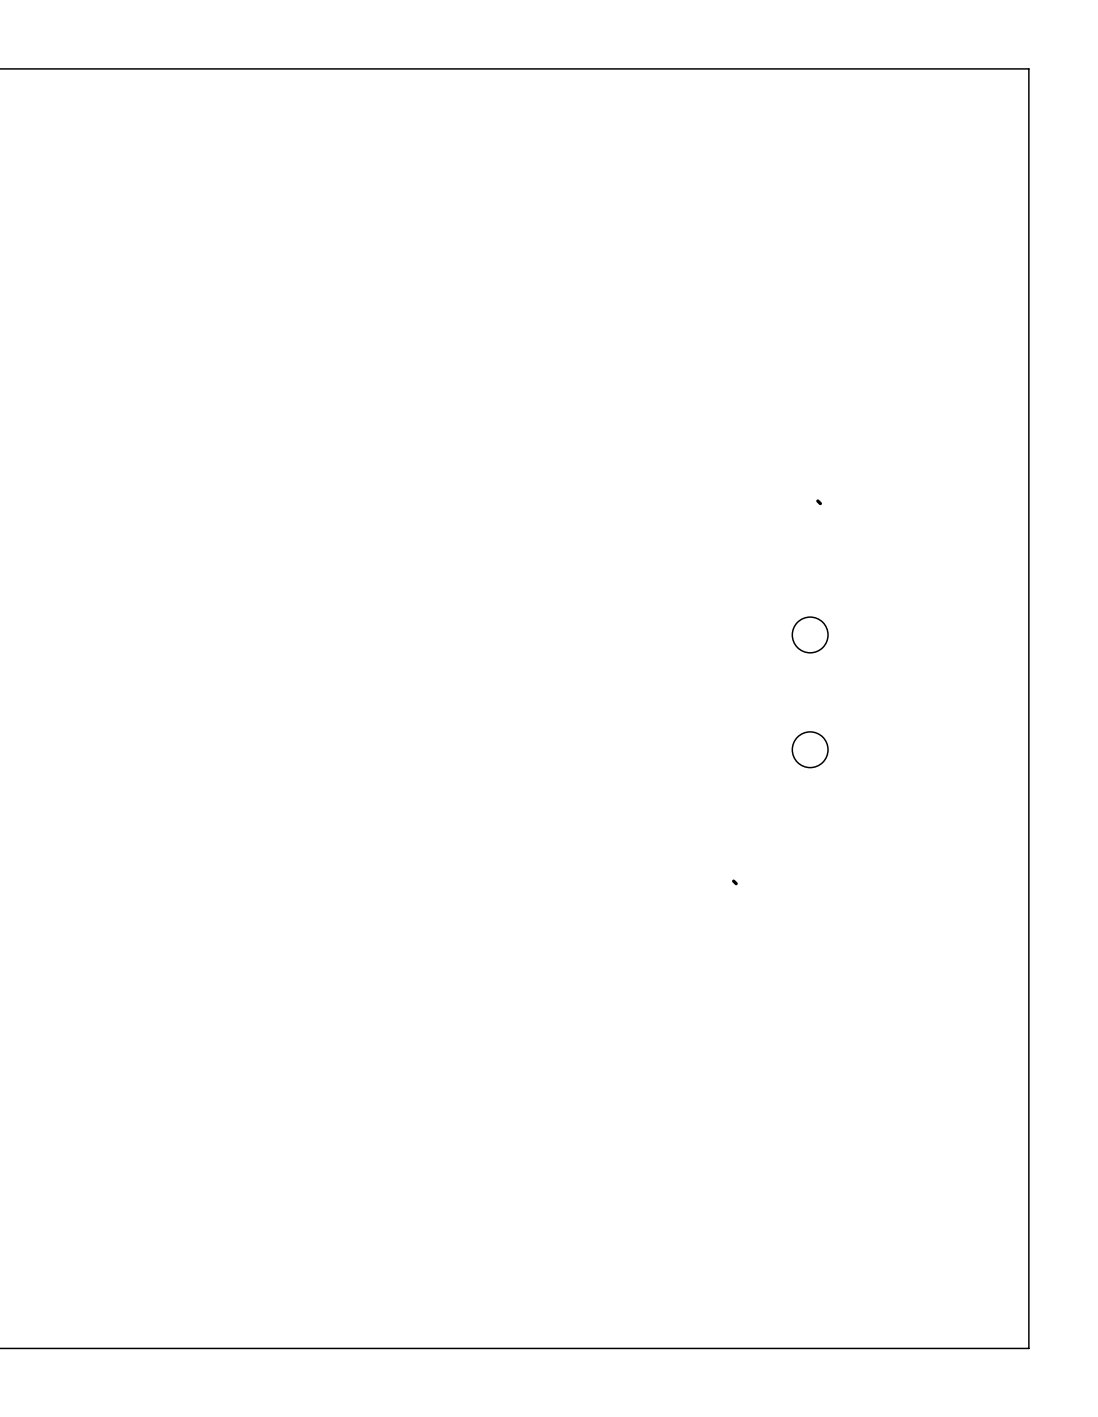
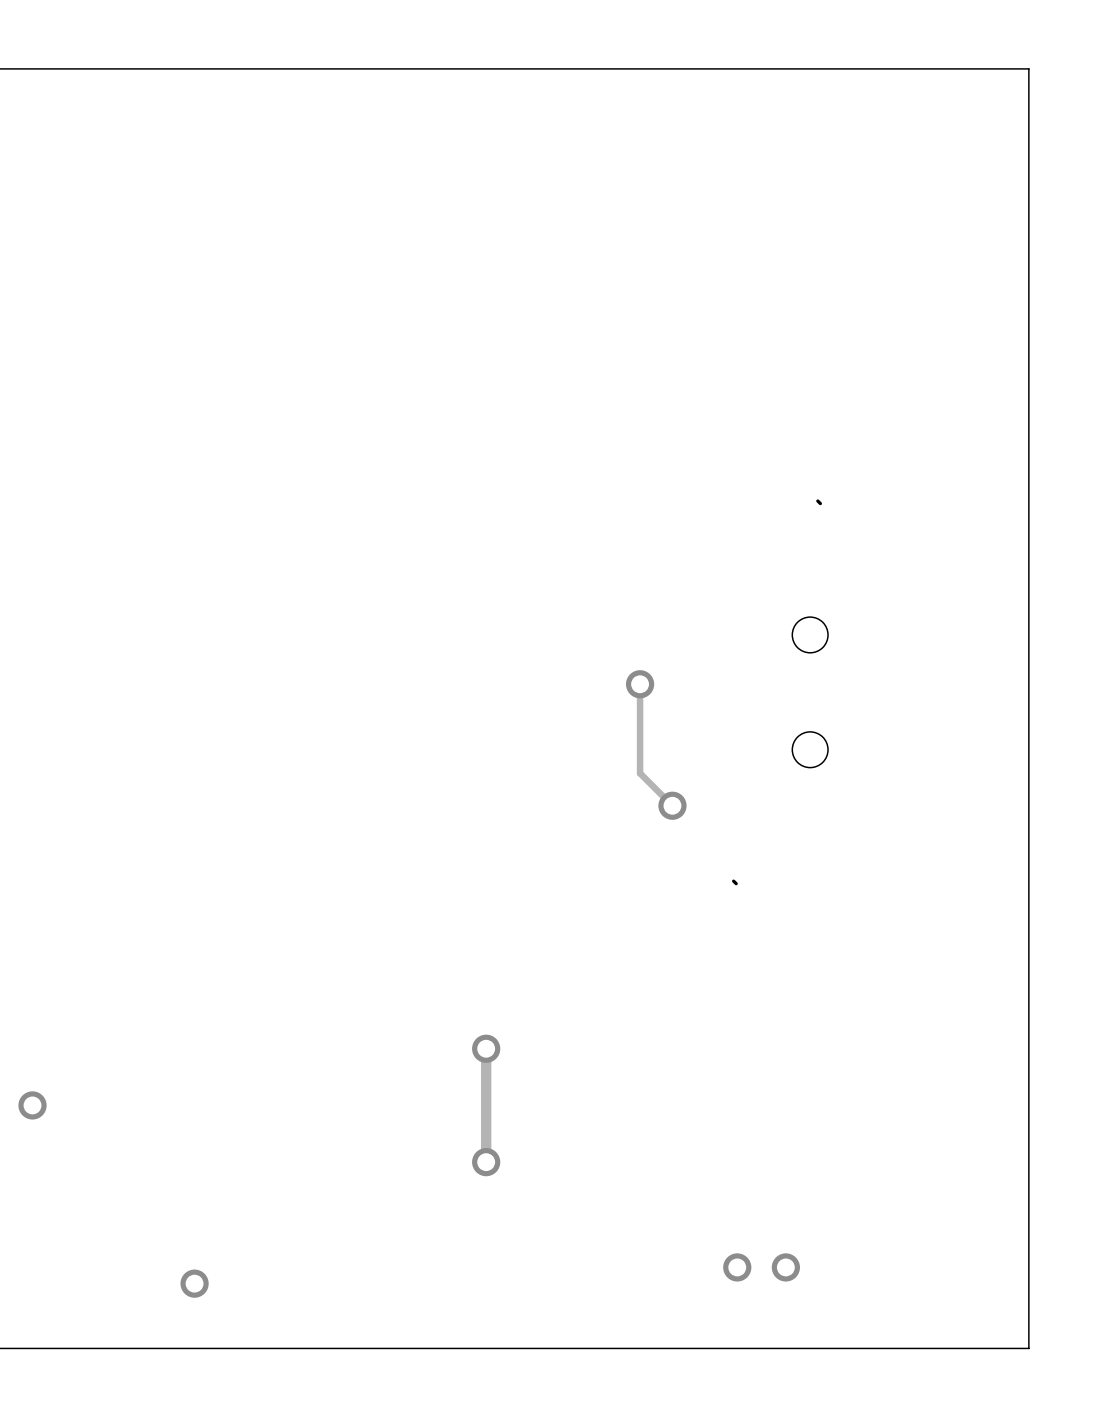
track: none -> (640, 684) (640, 773) (672, 805)
via: none -> (640, 684)
via: none -> (672, 805)
track: none -> (486, 1048) (486, 1162)
via: none -> (486, 1048)
via: none -> (32, 1105)
via: none -> (486, 1162)
via: none -> (737, 1267)
via: none -> (785, 1267)
via: none -> (194, 1283)

